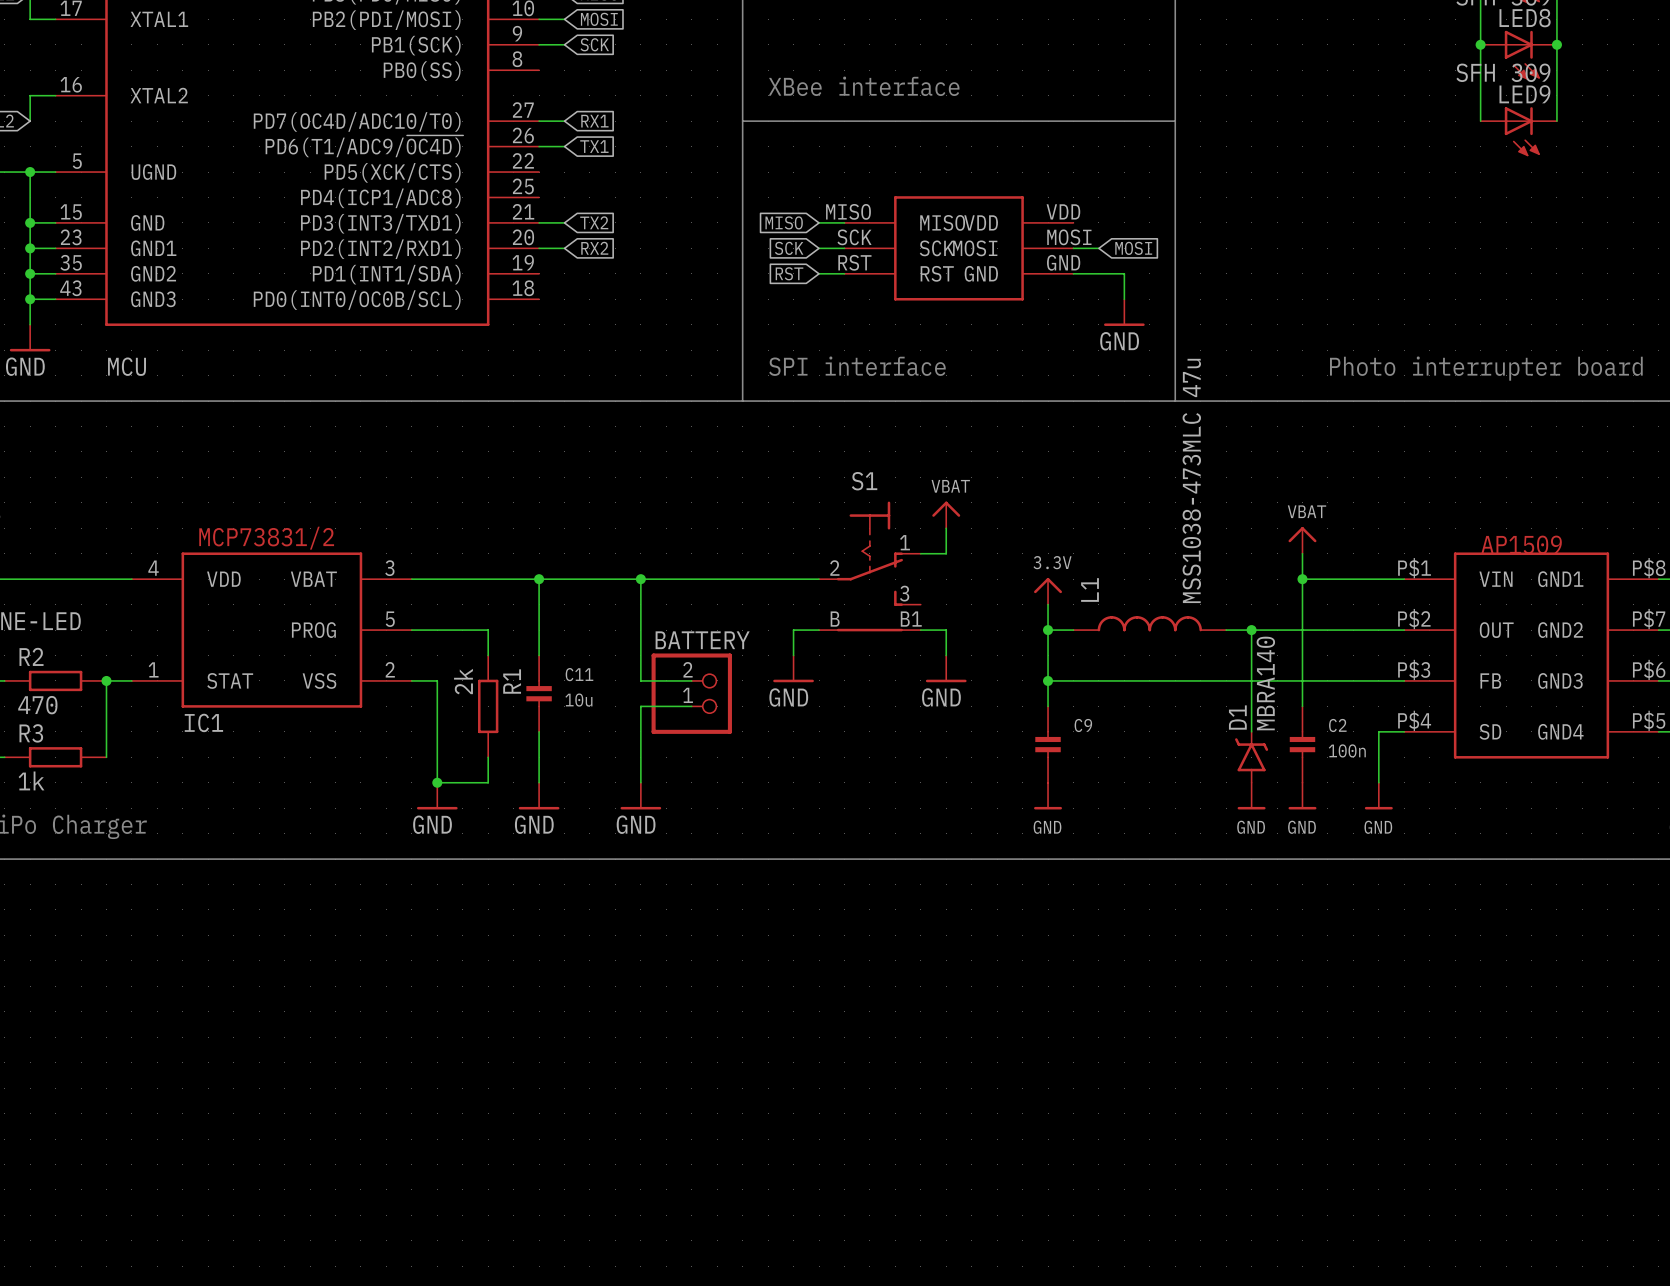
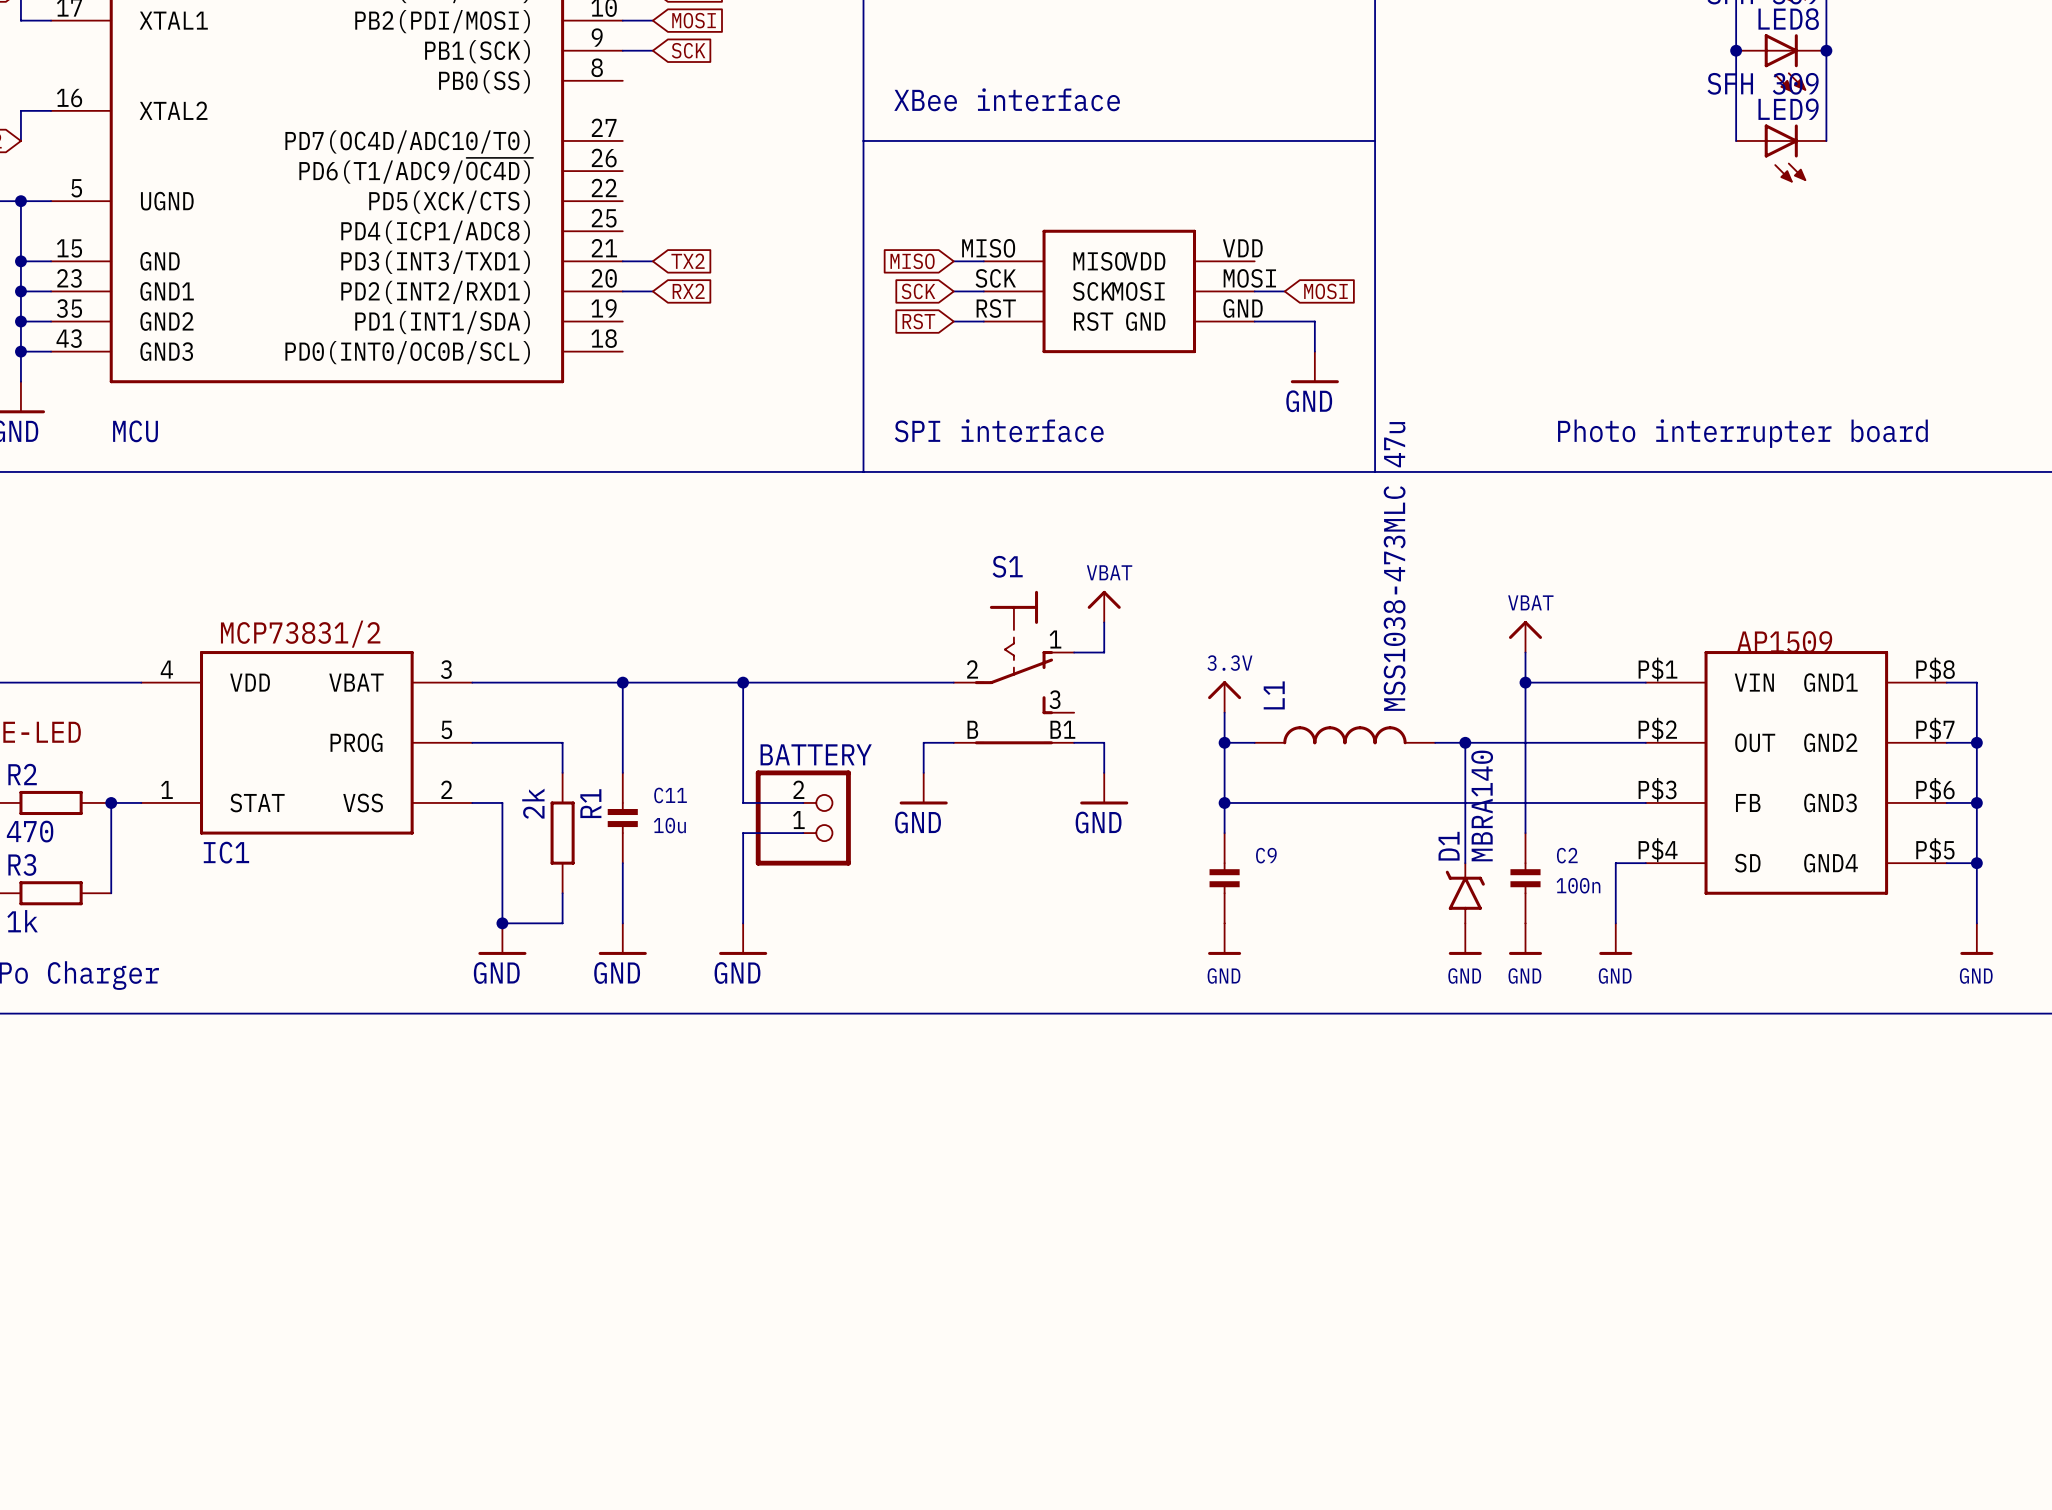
wire: (539, 121) (564, 121) -> none
global label: RX1 (594, 121) -> none
wire: (539, 146) (564, 146) -> none
global label: TX1 (594, 146) -> none

